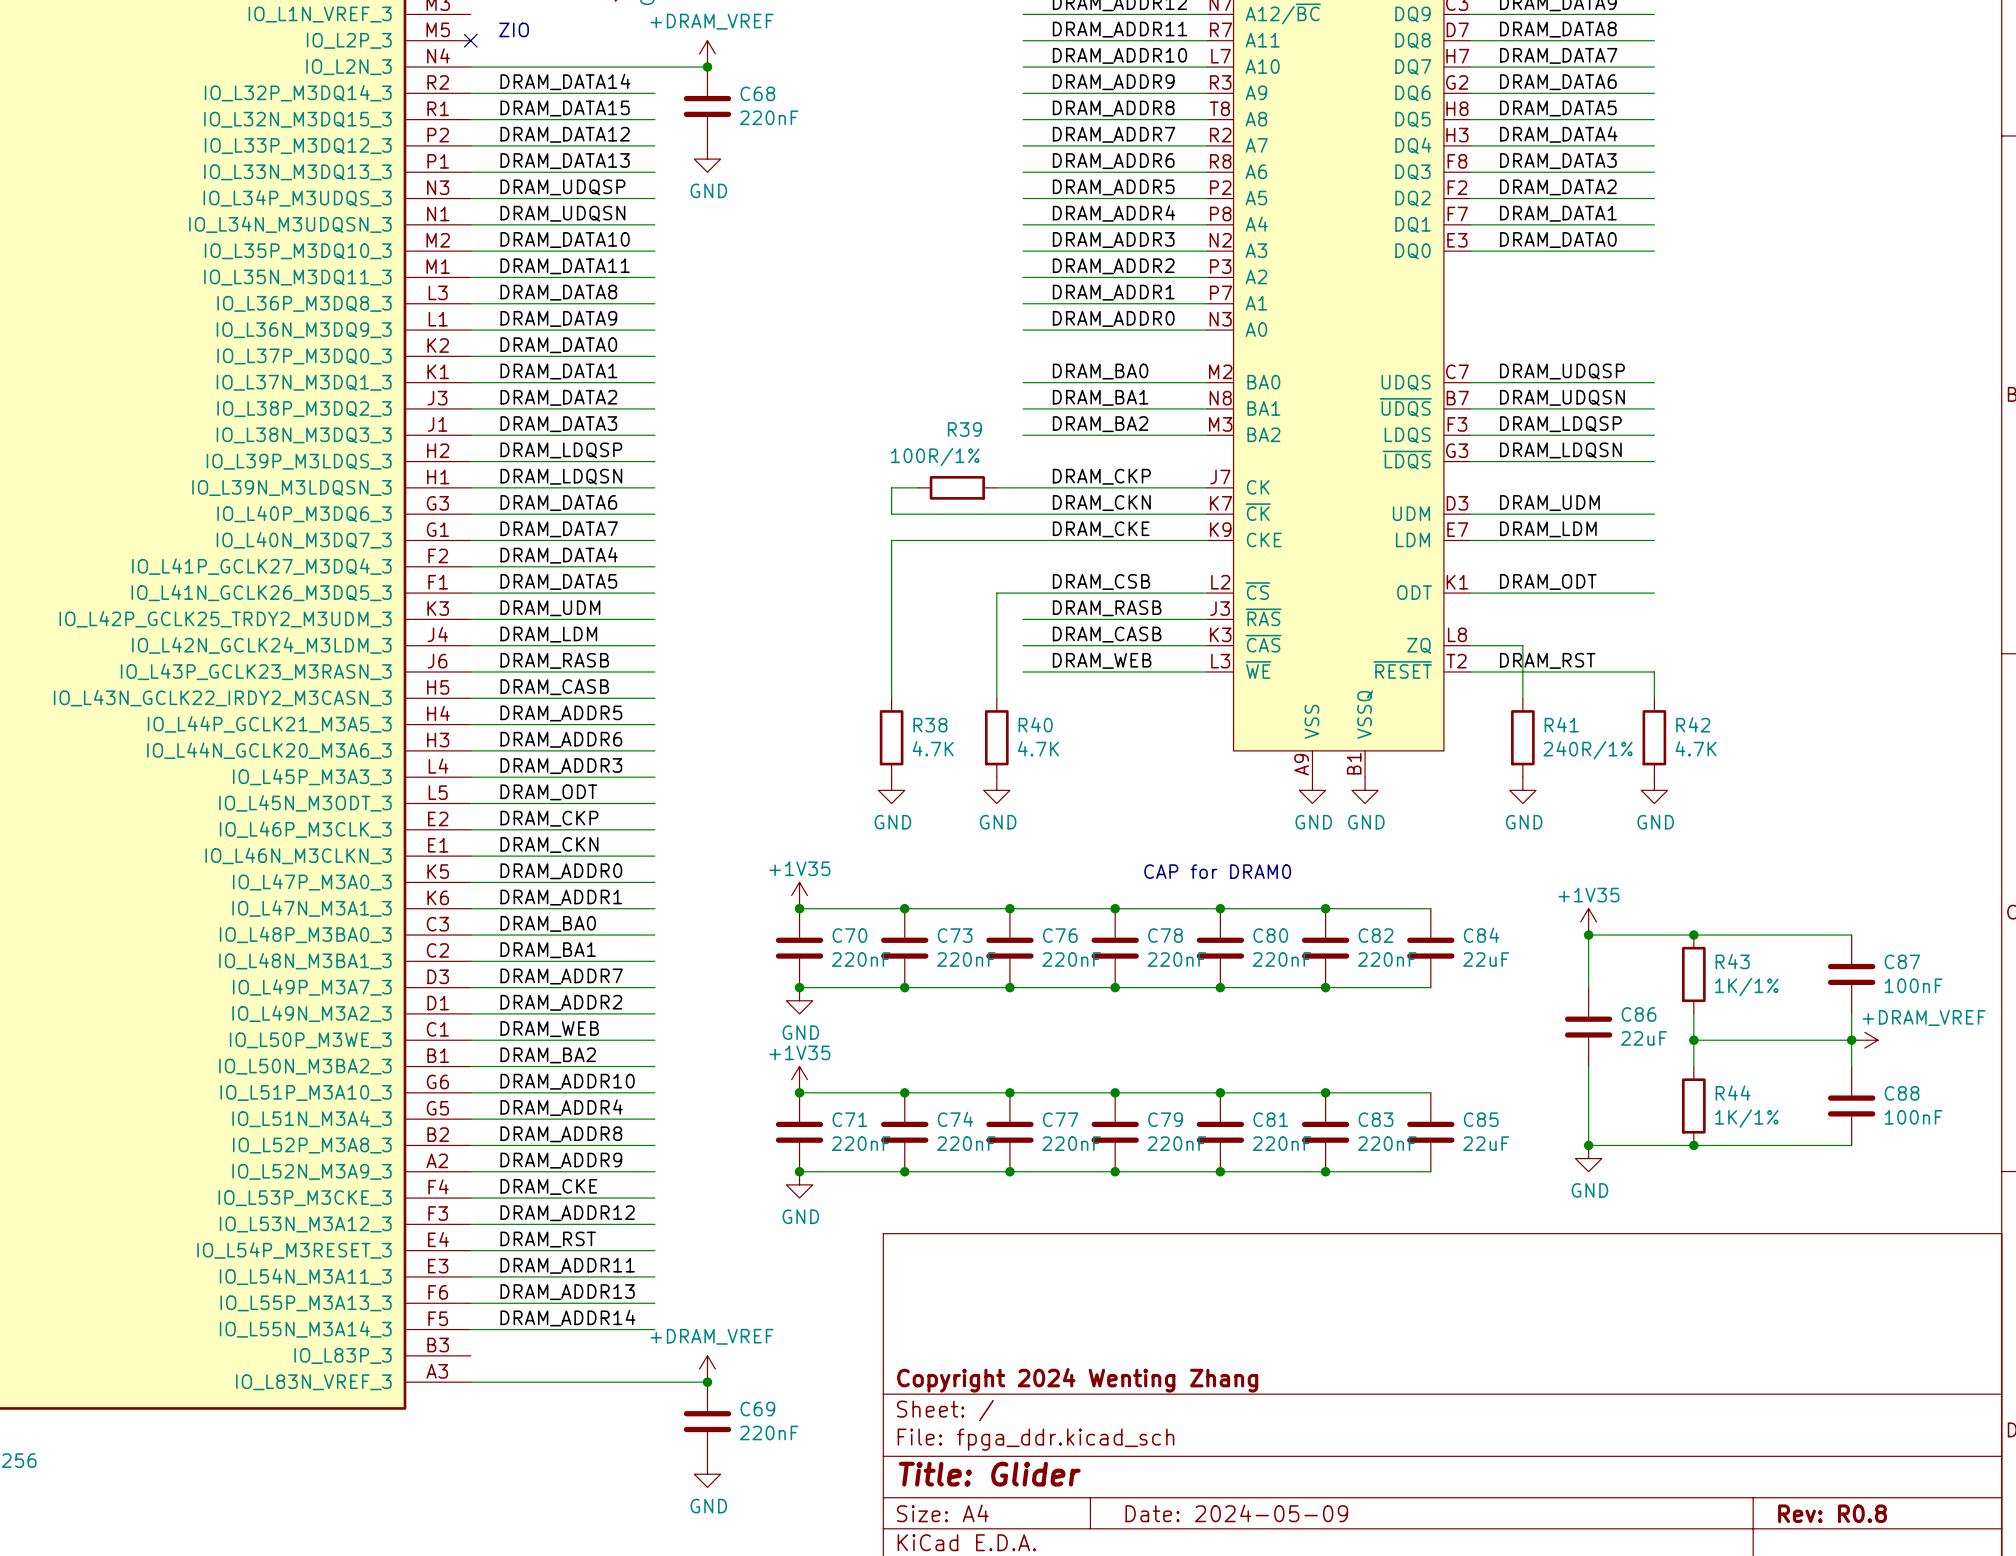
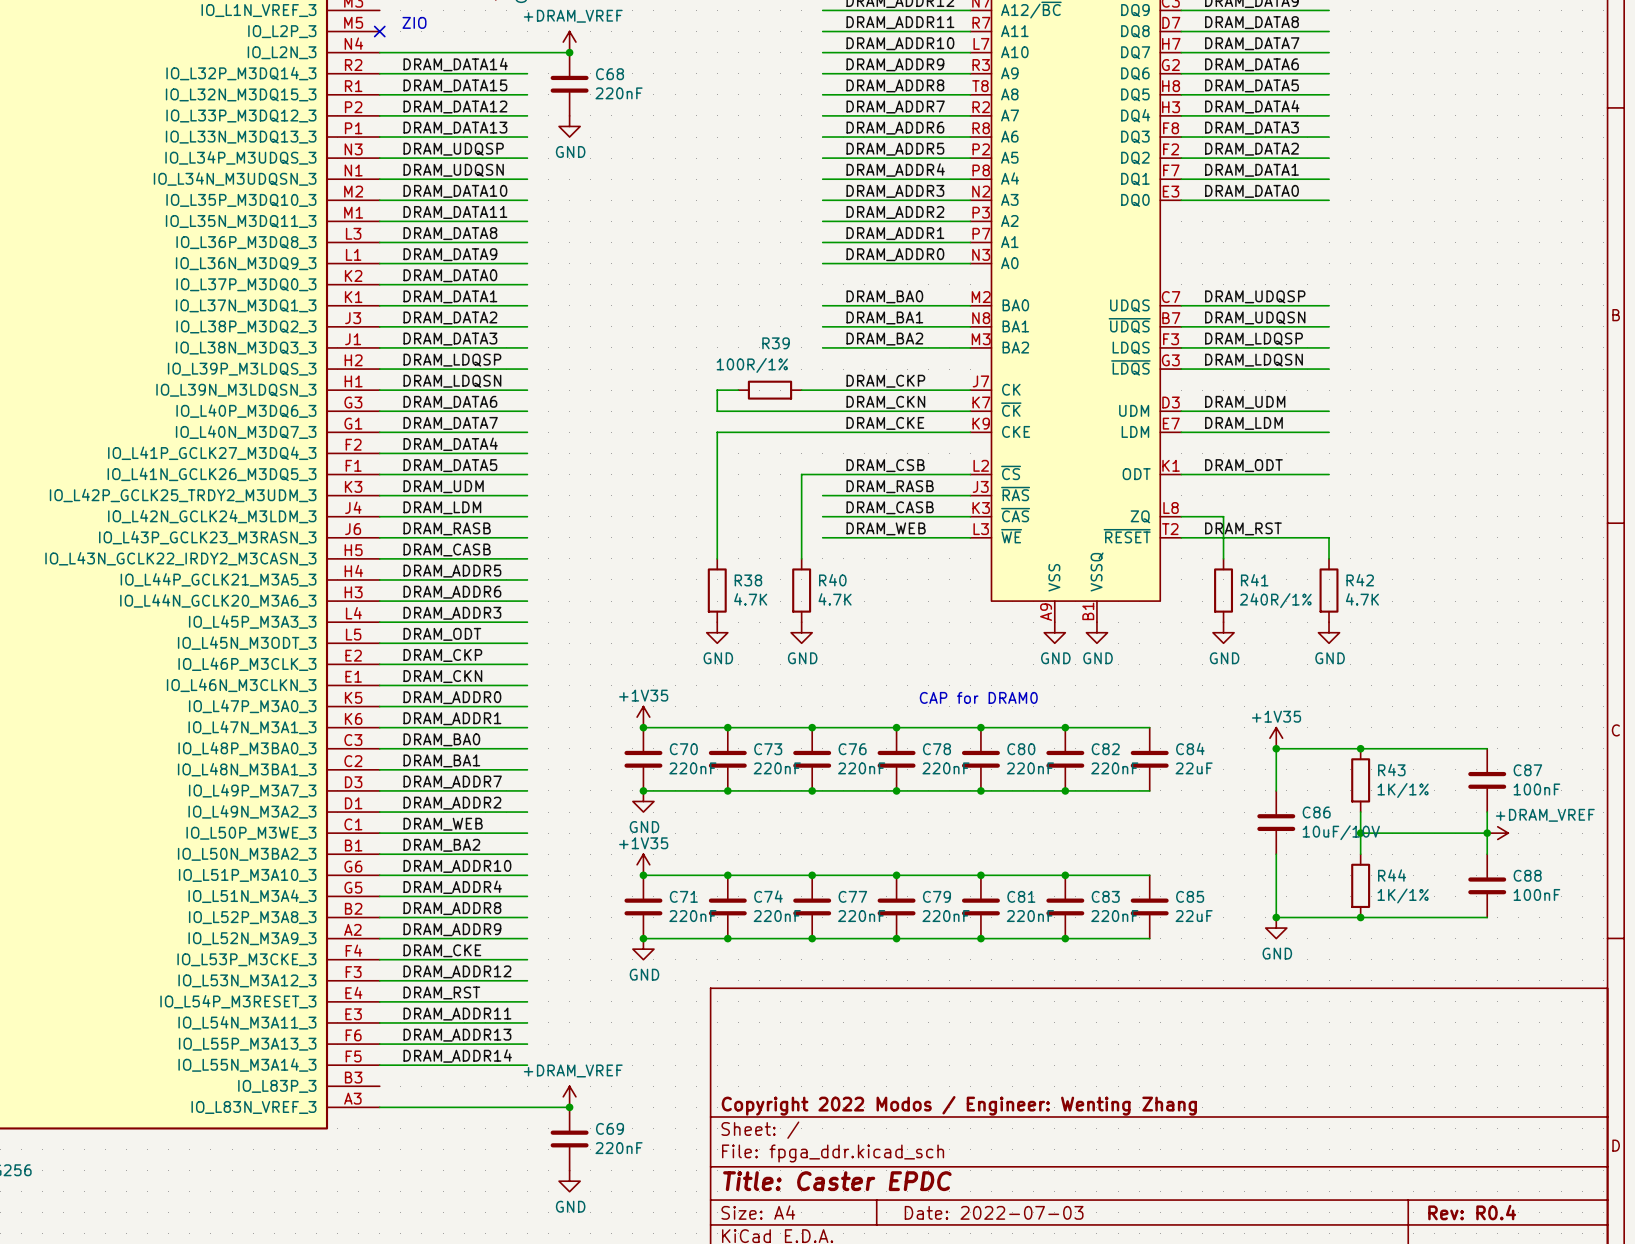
C86 value: 22uF (1644, 1038) -> 10uF/10V (1341, 832)
title block: Copyright 2024 Wenting Zhang (1077, 1380) -> Copyright 2022 Modos / Engineer: Wenting Zhang (959, 1105)
title block: Title: Glider (989, 1474) -> Title: Caster EPDC (837, 1181)
title block: Date: 2024-05-09 (1236, 1513) -> Date: 2022-07-03 (994, 1212)
title block: Rev: R0.8 (1832, 1513) -> Rev: R0.4 (1472, 1212)

